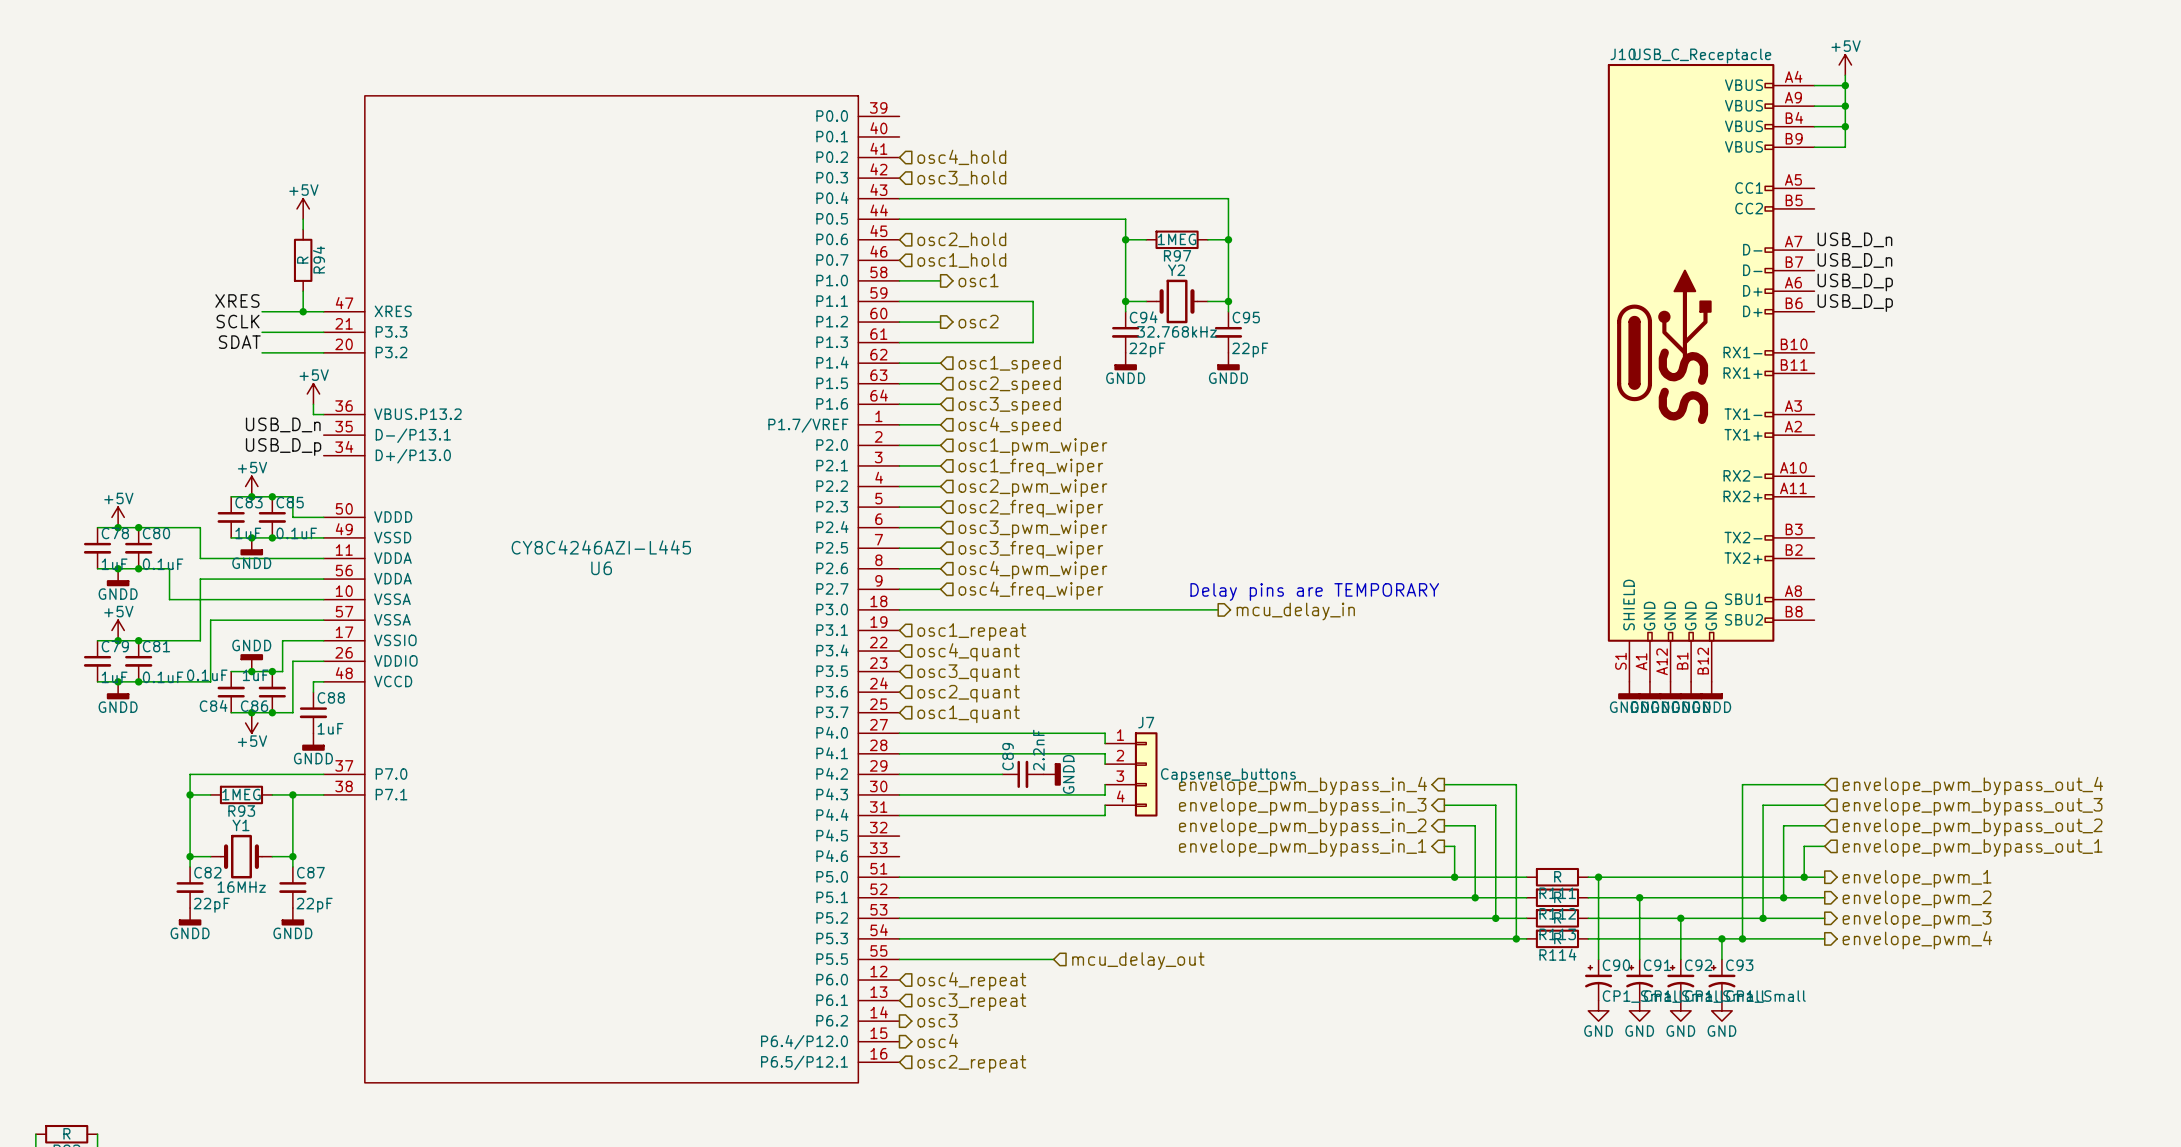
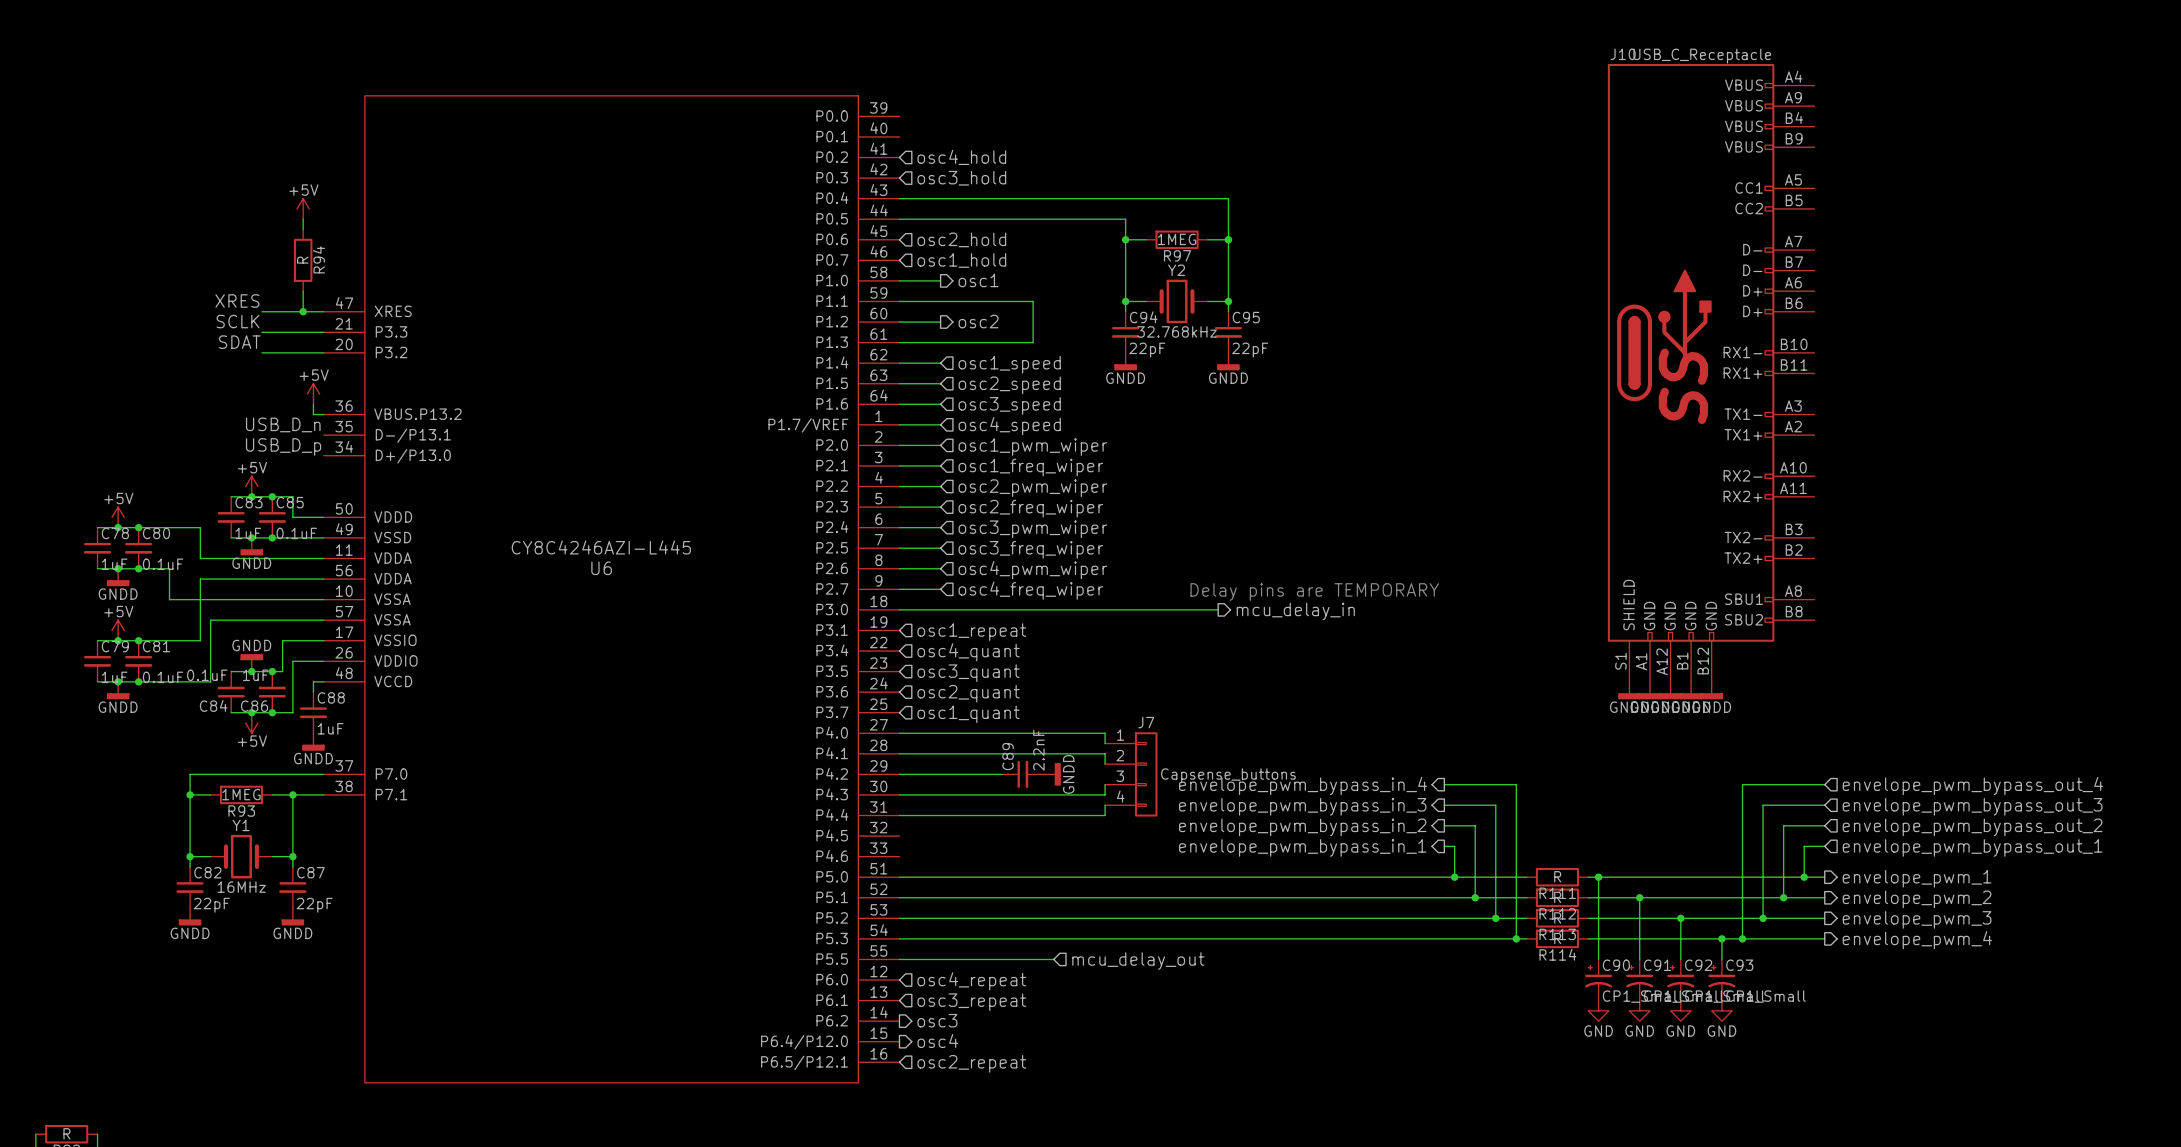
power symbol: +5V (1845, 65) -> none
wire: (1845, 75) (1845, 147) (1814, 147) -> none
wire: (1814, 85) (1845, 85) -> none
junction: (1845, 85) -> none
wire: (1814, 106) (1845, 106) -> none
junction: (1845, 106) -> none
wire: (1814, 126) (1845, 126) -> none
junction: (1845, 126) -> none
label: USB_D_n (1854, 239) -> none
label: USB_D_n (1854, 260) -> none
label: USB_D_p (1855, 282) -> none
label: USB_D_p (1855, 303) -> none

